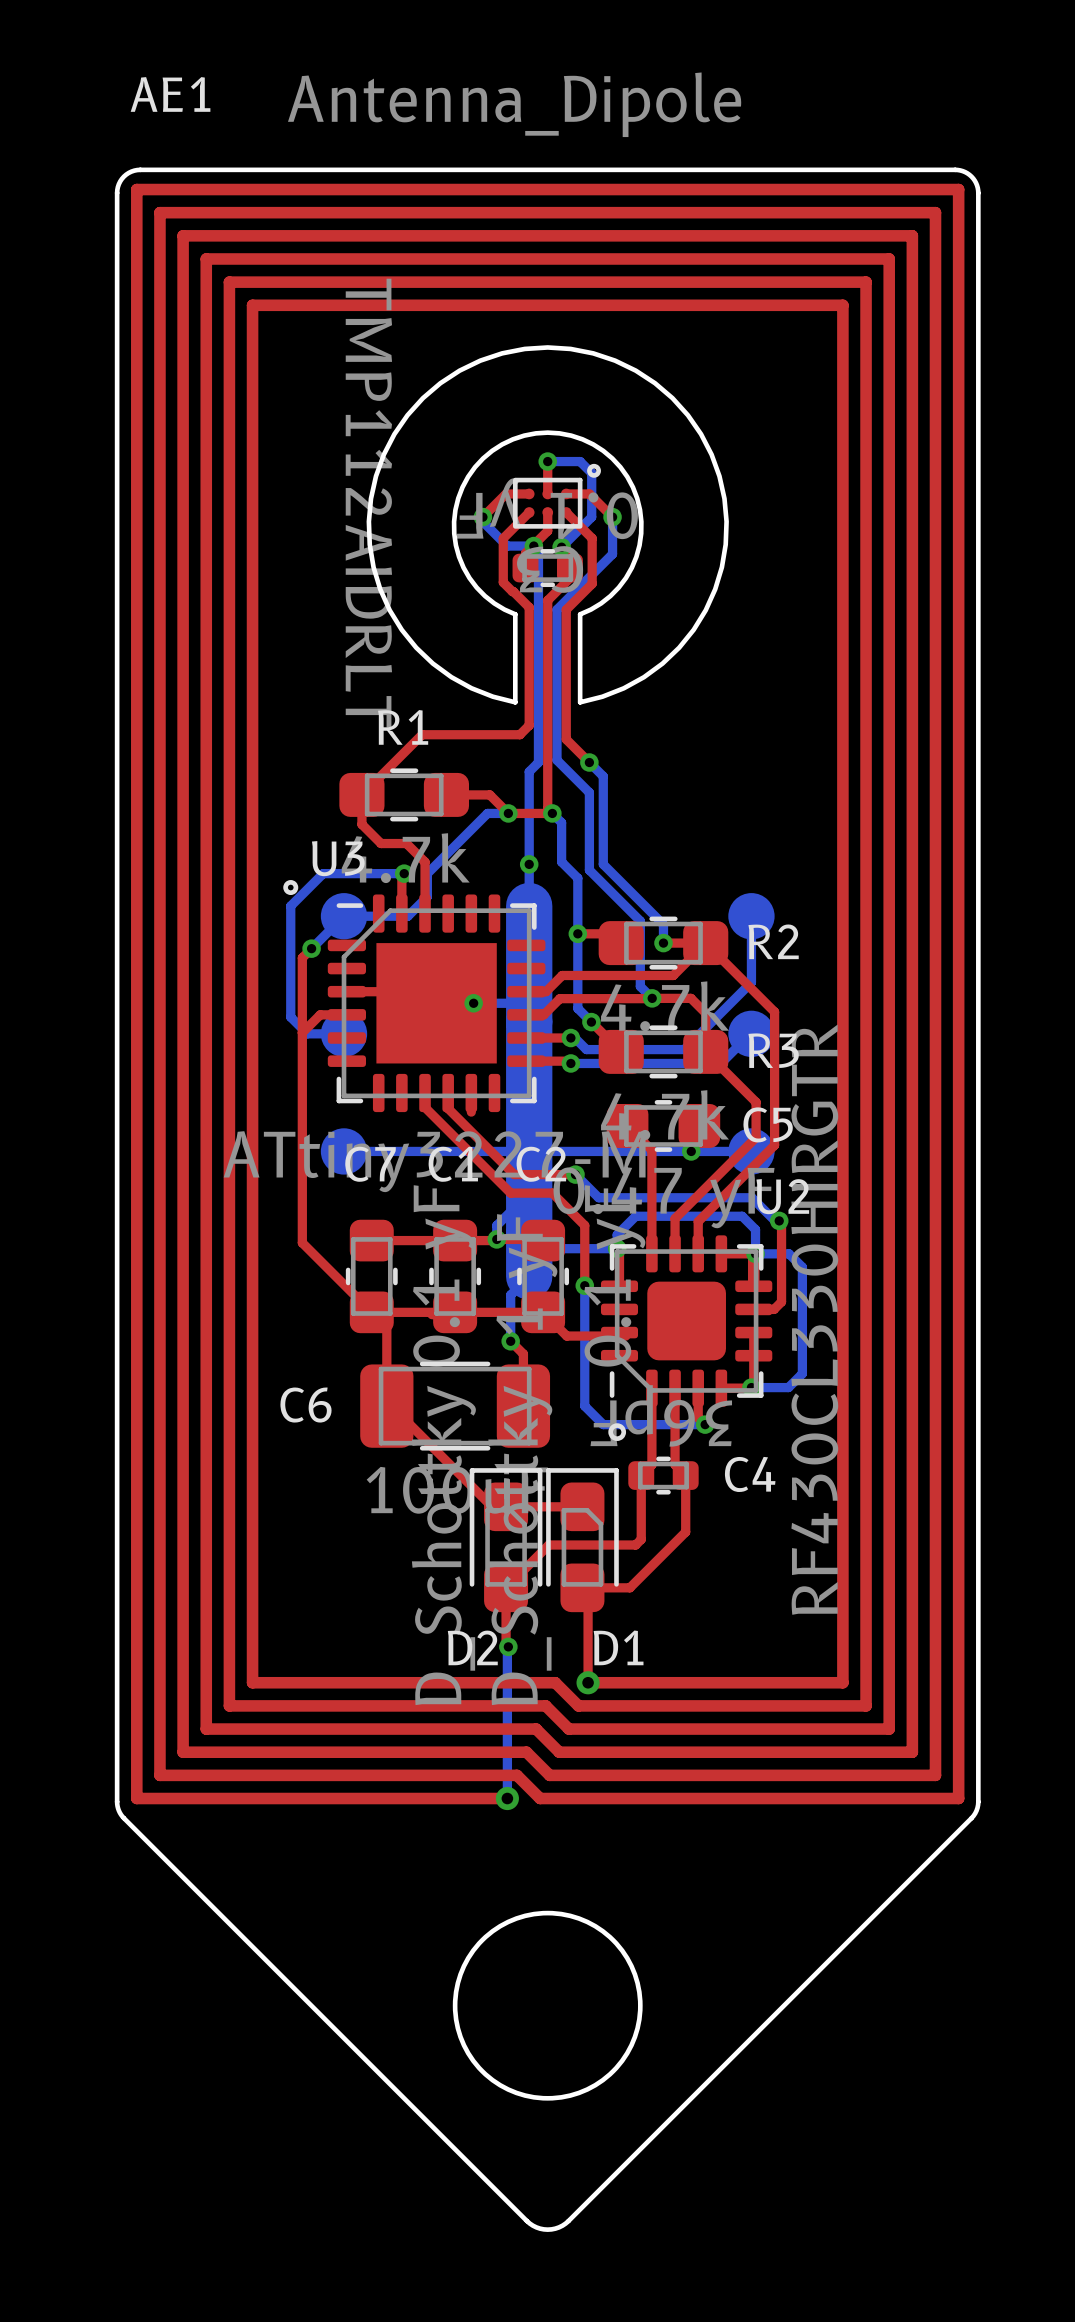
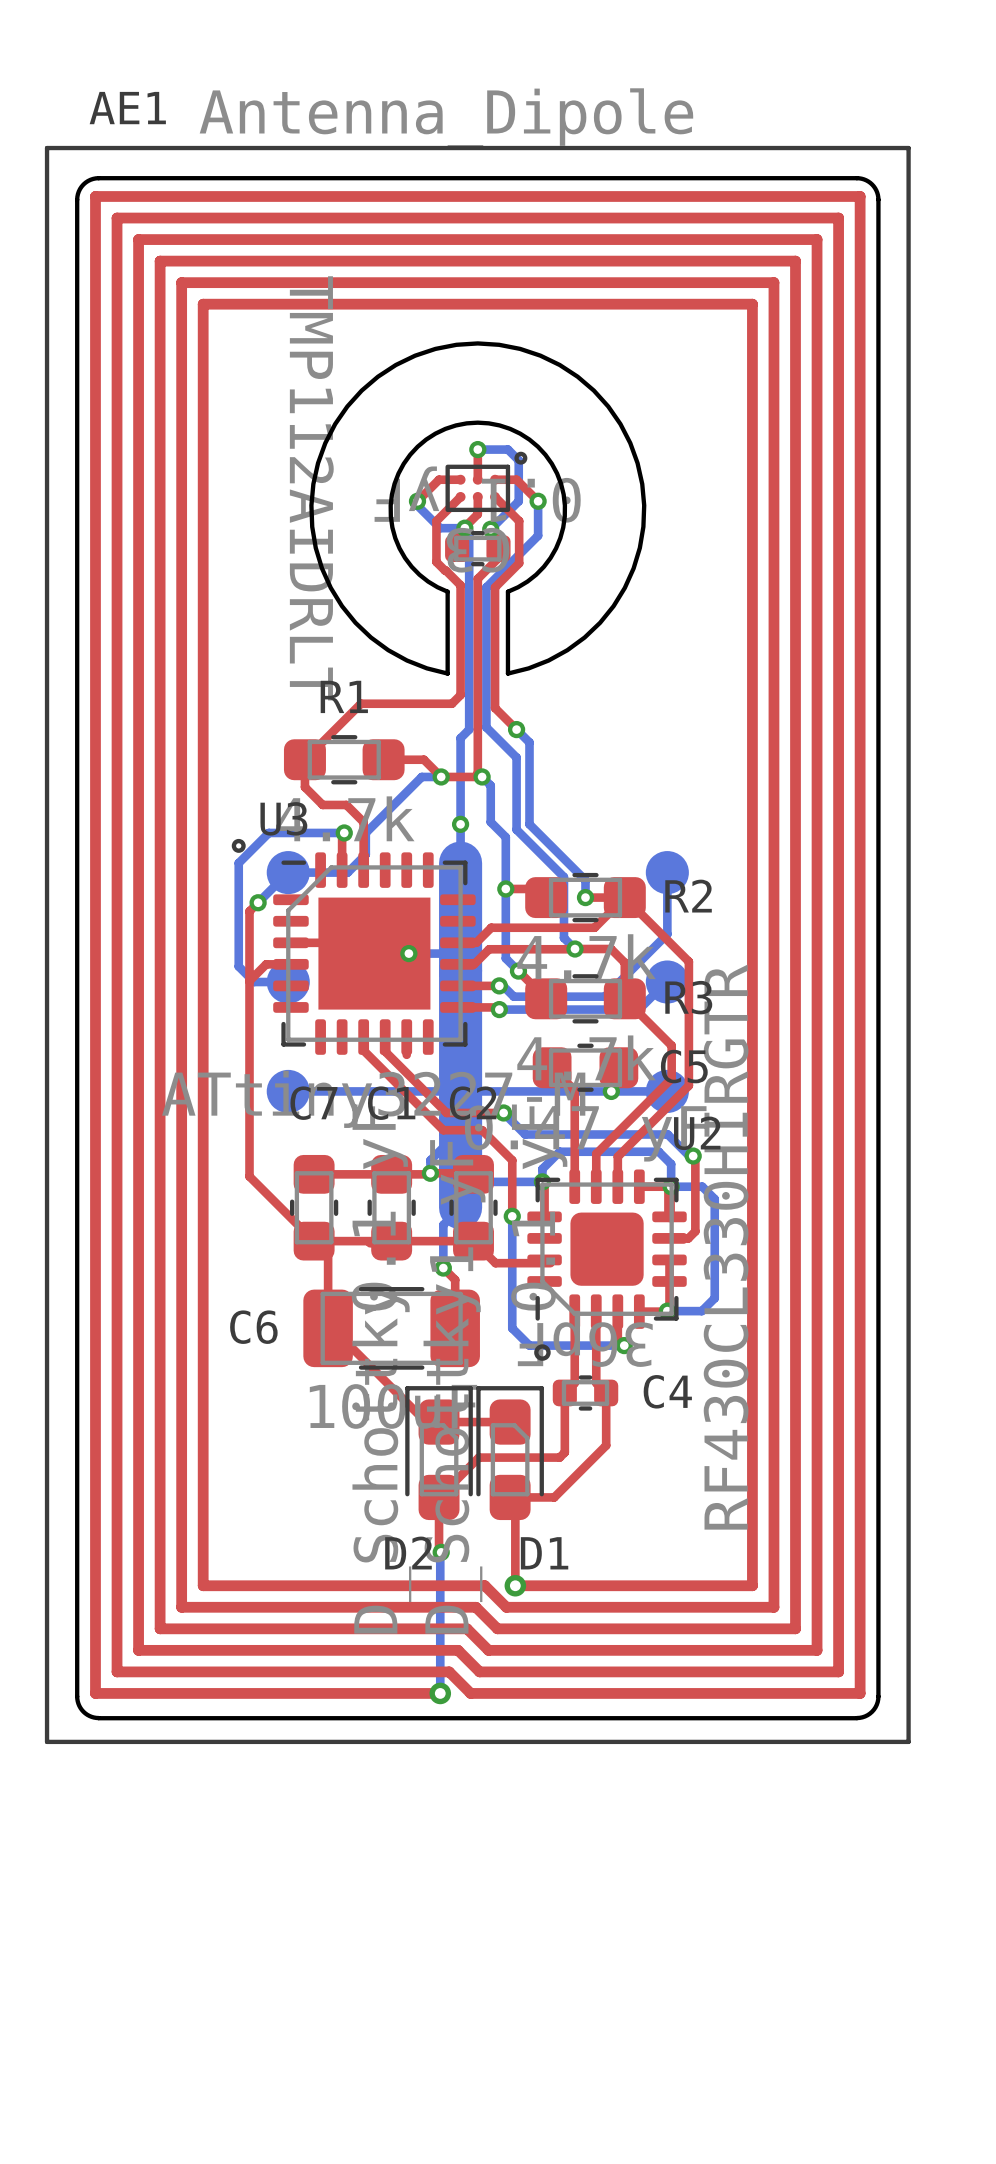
AE1 footprint: [131, 183, 965, 1811] -> [44, 145, 911, 1745]
board edge: (117, 1801) (118, 1810) (123, 1818) (526, 2221) (536, 2227) (547, 2229) (559, 2227) (568, 2221) (971, 1818) (976, 1810) (978, 1801) -> (77, 1696) (78, 1703) (83, 1711) (91, 1716) (98, 1718) (856, 1718) (865, 1716) (872, 1711) (876, 1704) (878, 1696)
round board edge: [452, 1910, 643, 2101] -> none

